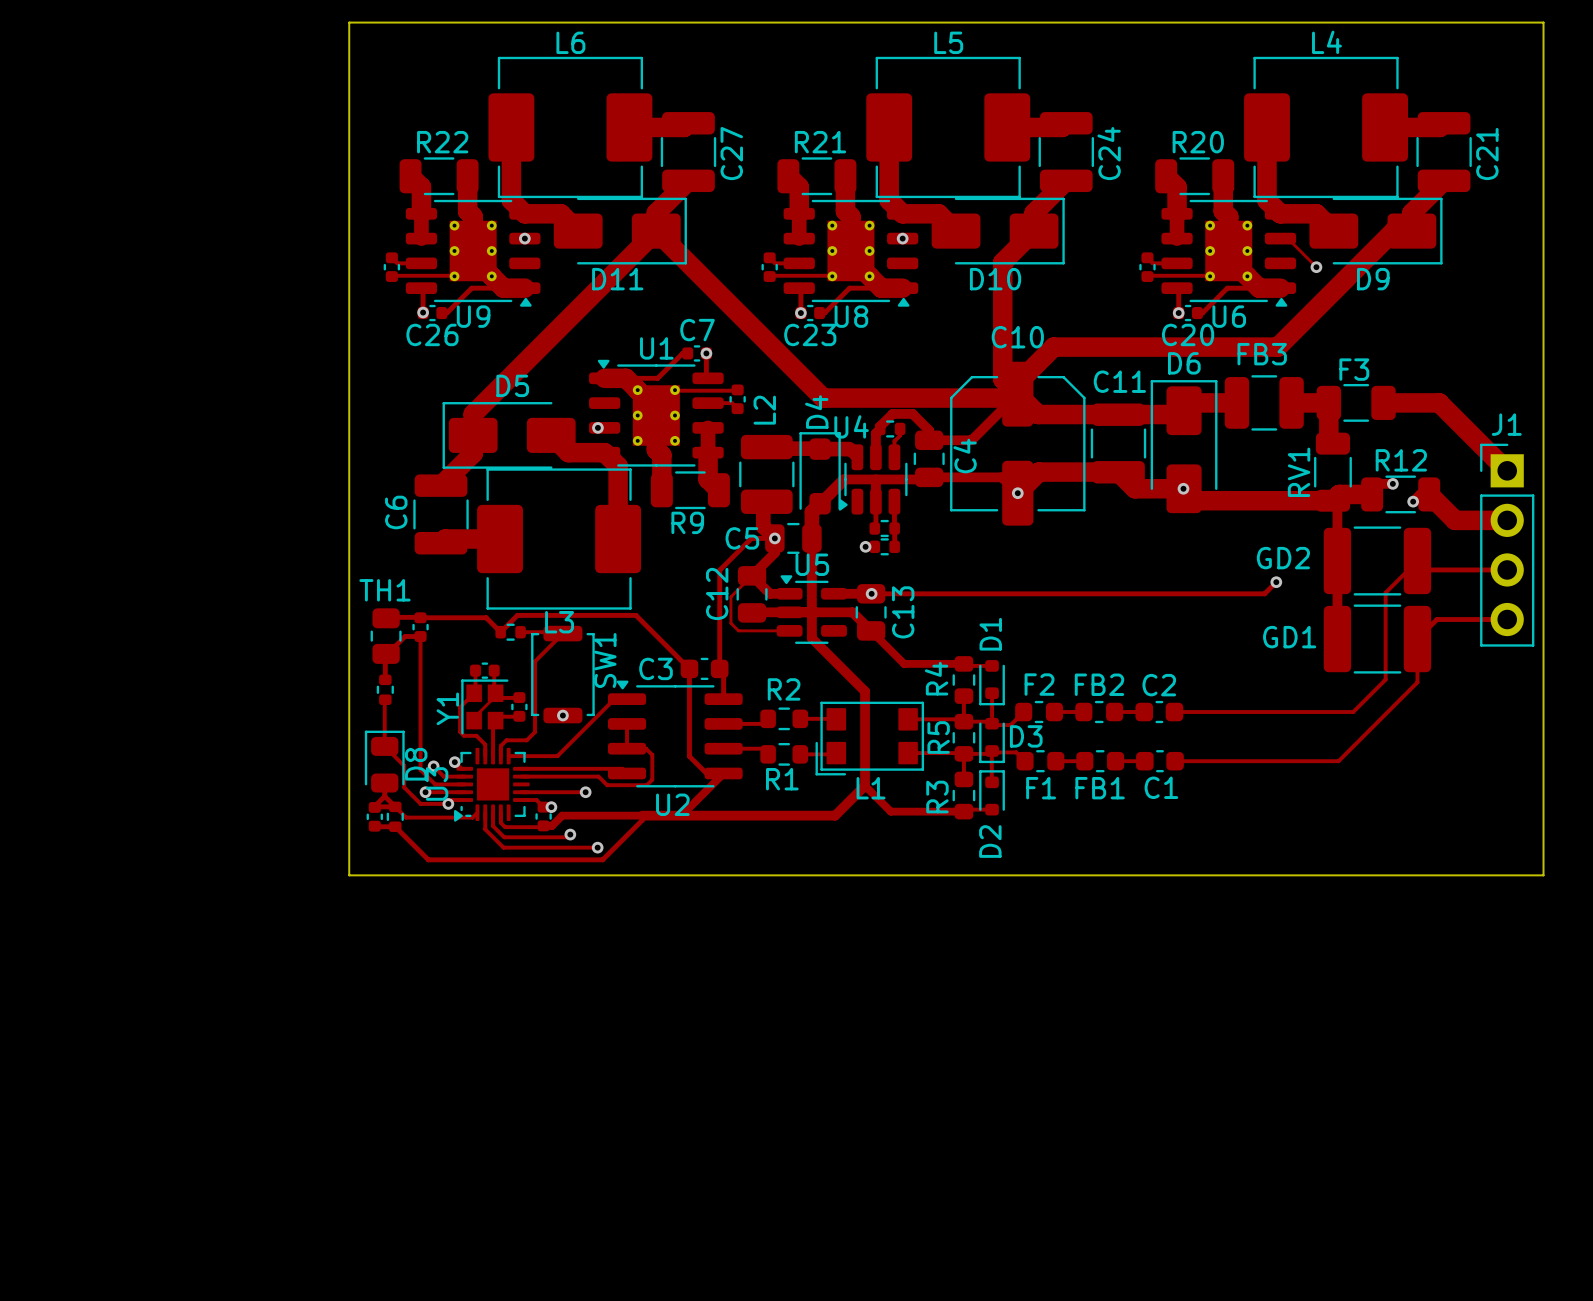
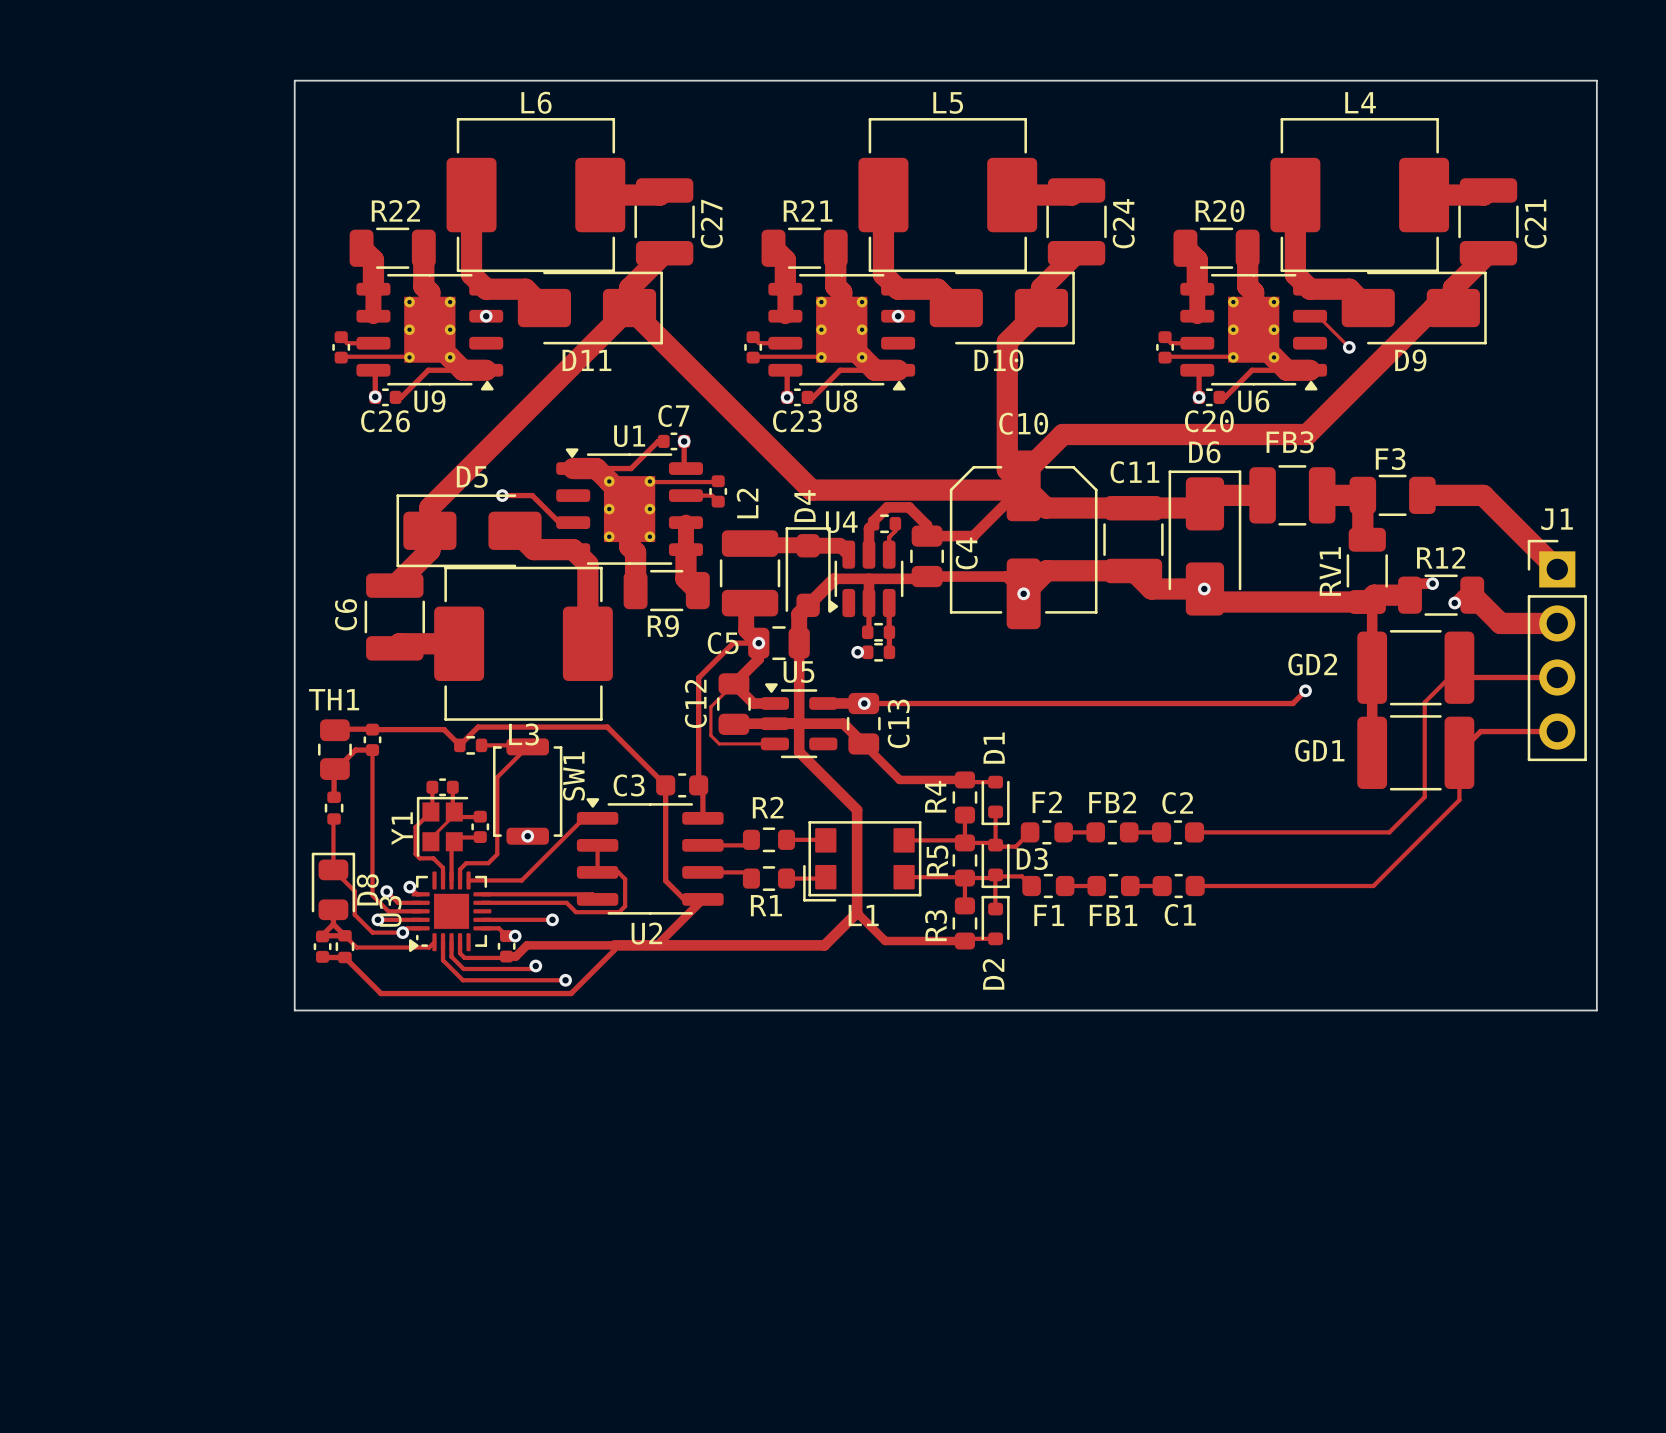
track: none -> (502, 495) (532, 495) (559, 522) (565, 522)
via position: (597, 427) -> (502, 495)

